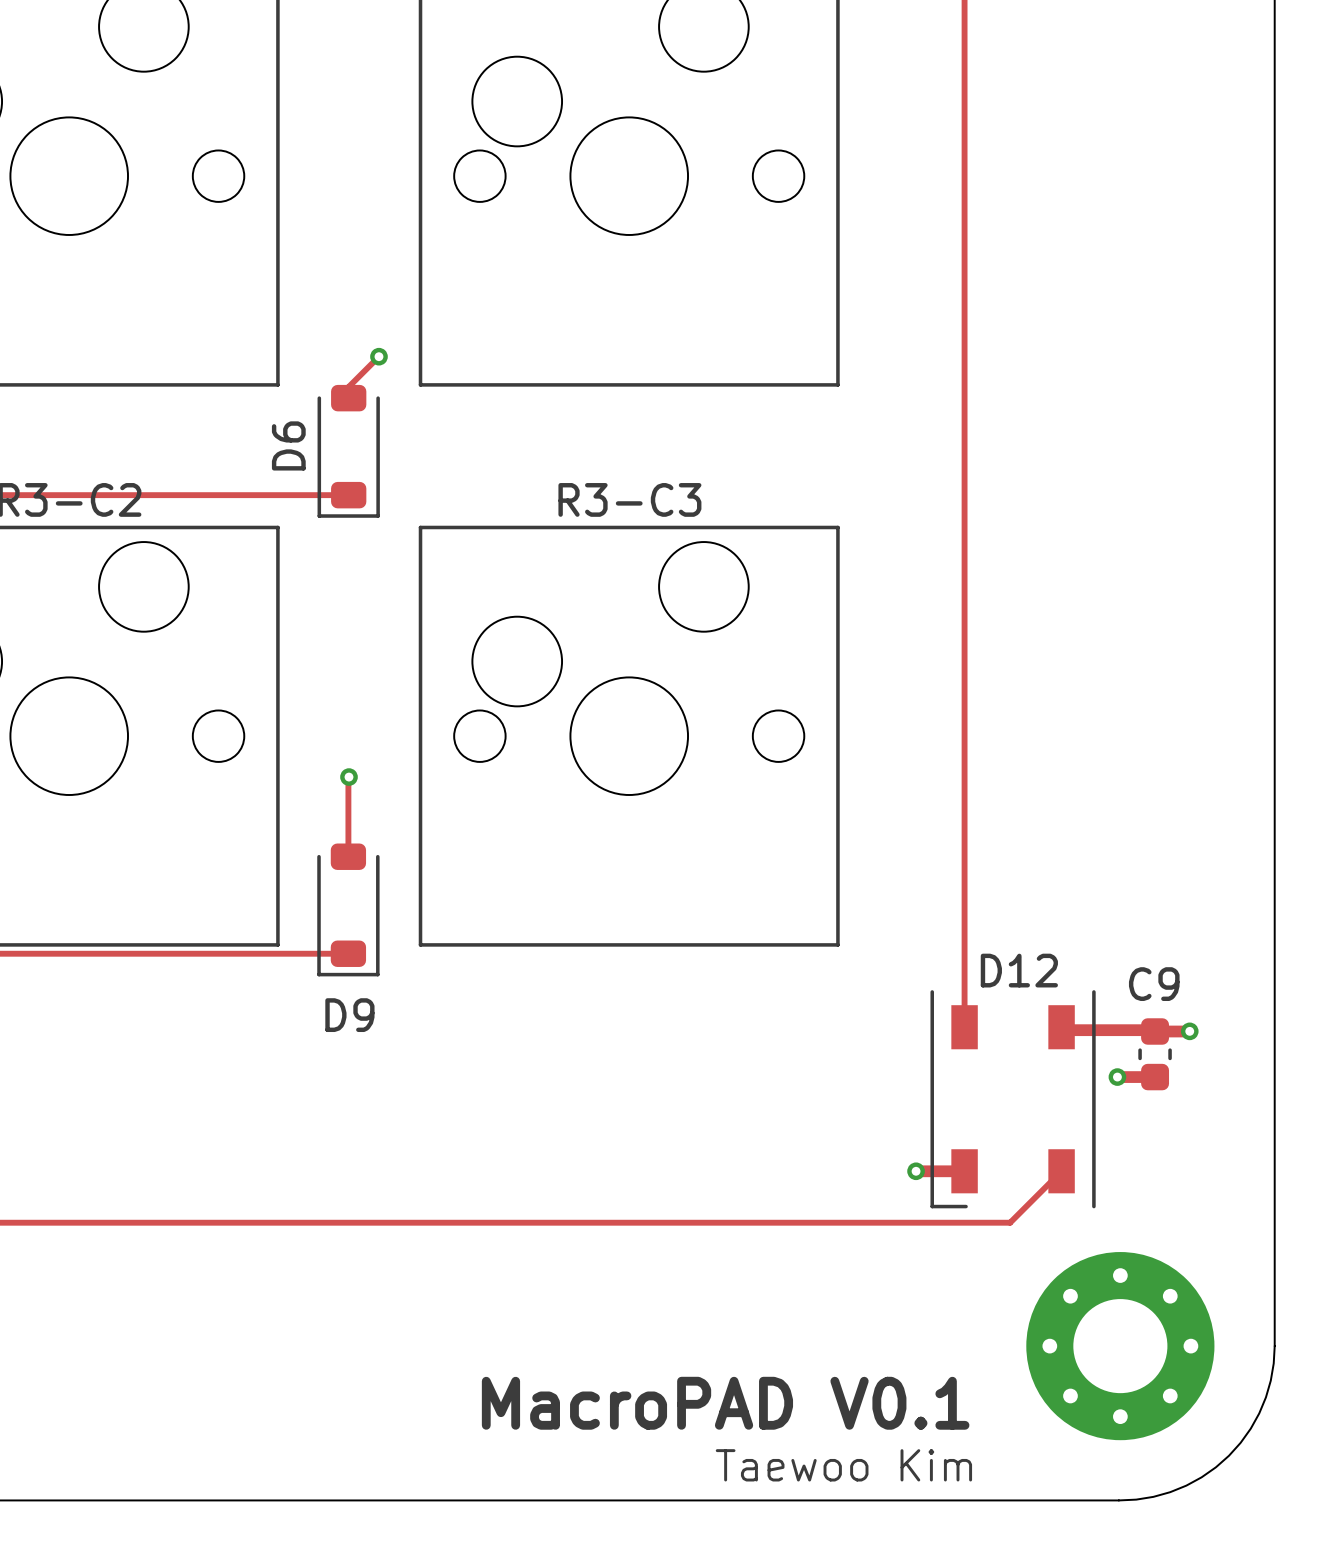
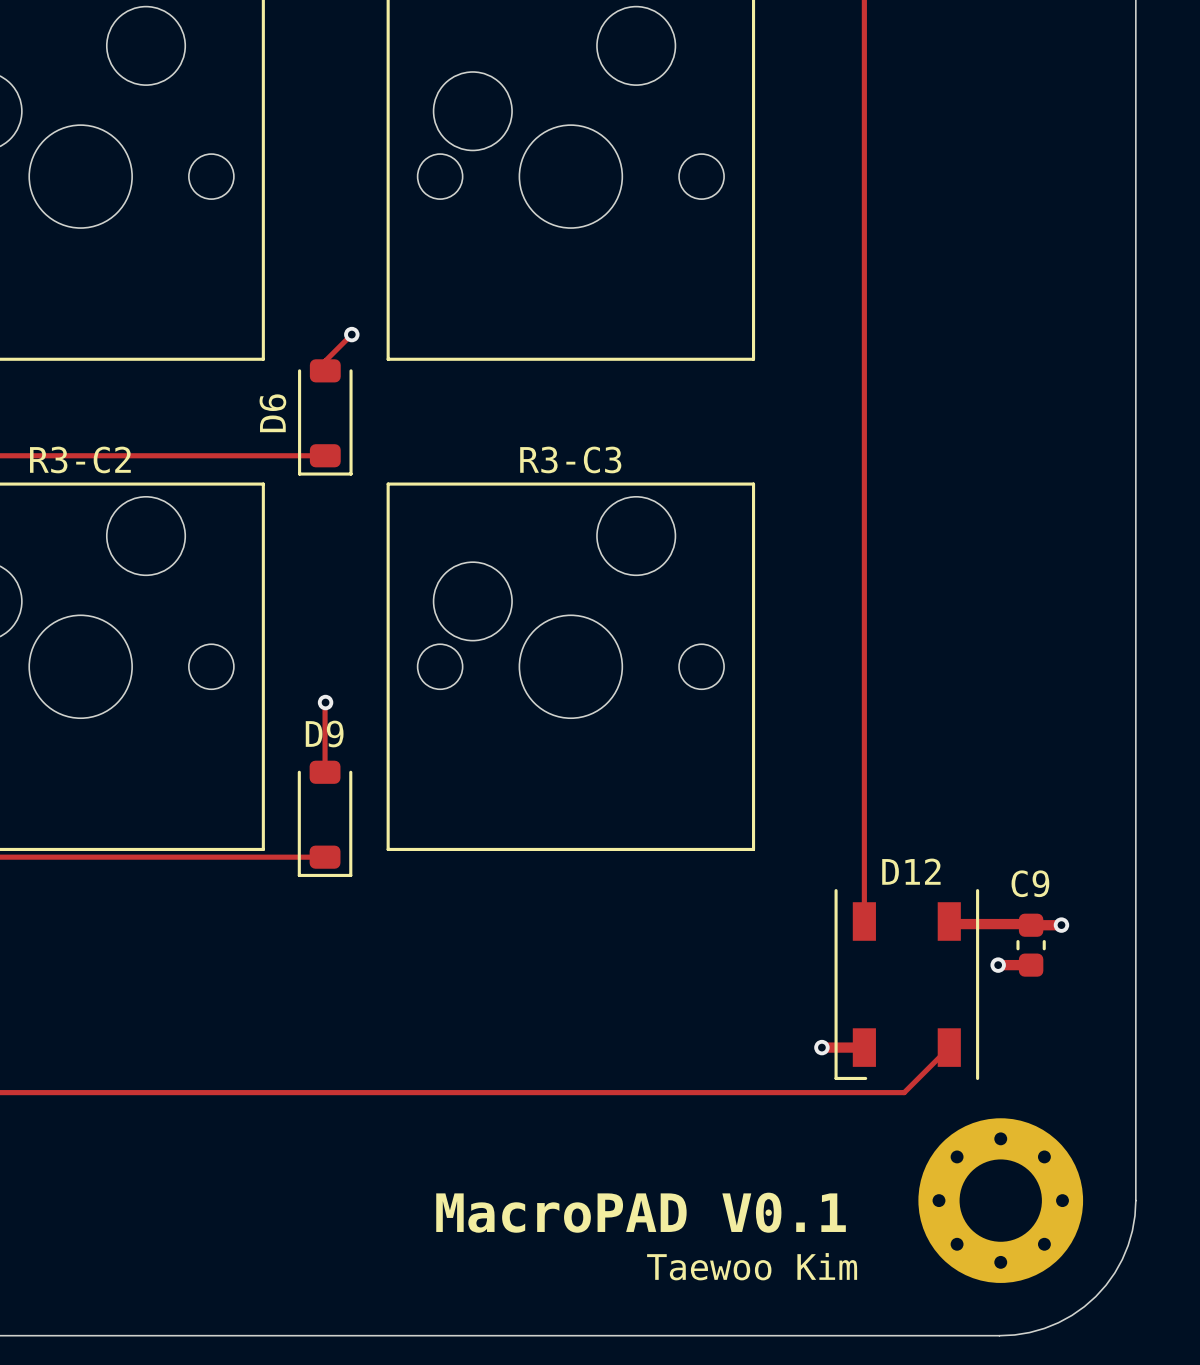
D9 name position: D9 (349, 1015) -> D9 (324, 734)
text position: MacroPAD V0.1 (725, 1403) -> MacroPAD V0.1 (641, 1212)
text position: Taewoo Kim (843, 1465) -> Taewoo Kim (752, 1266)

